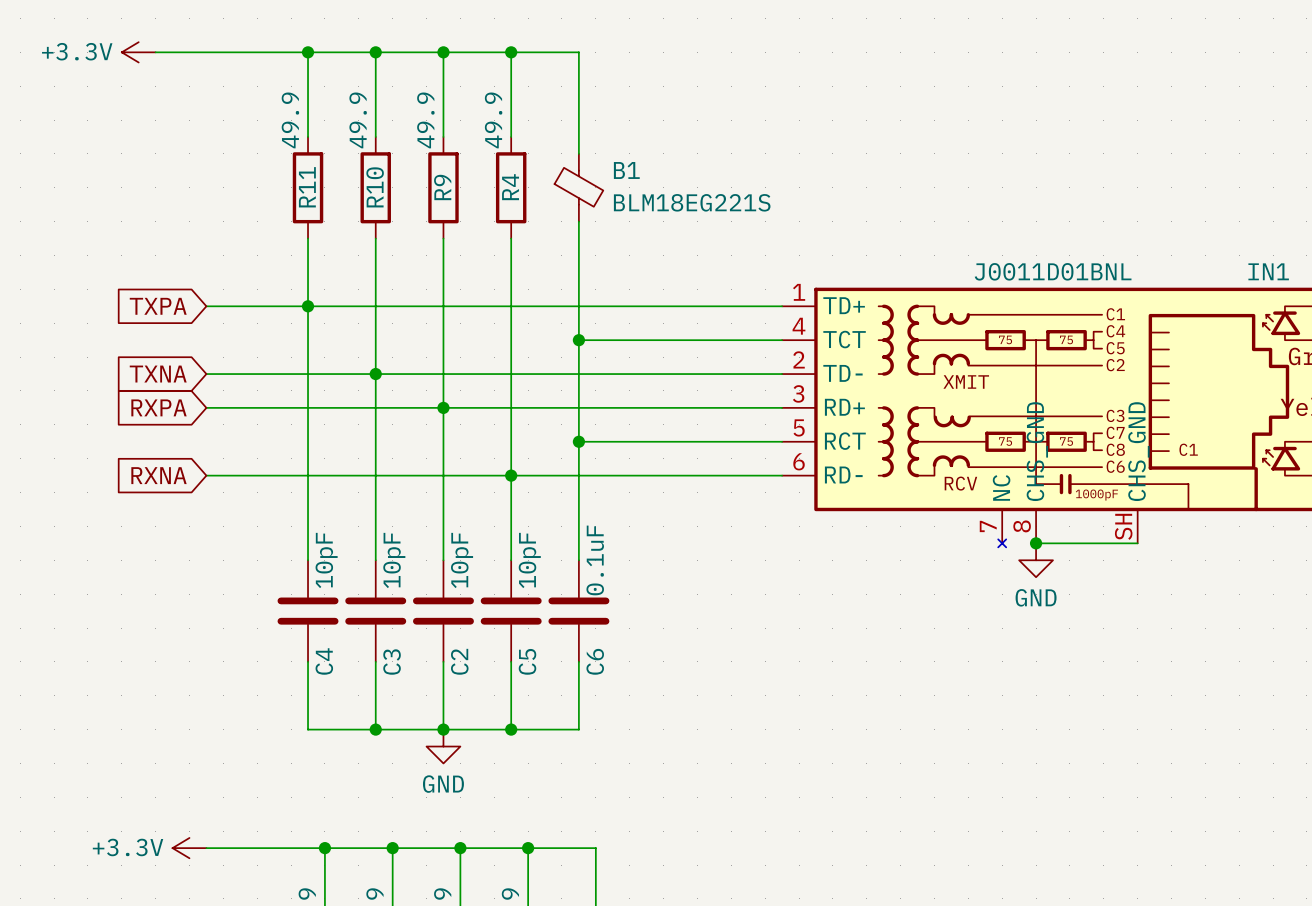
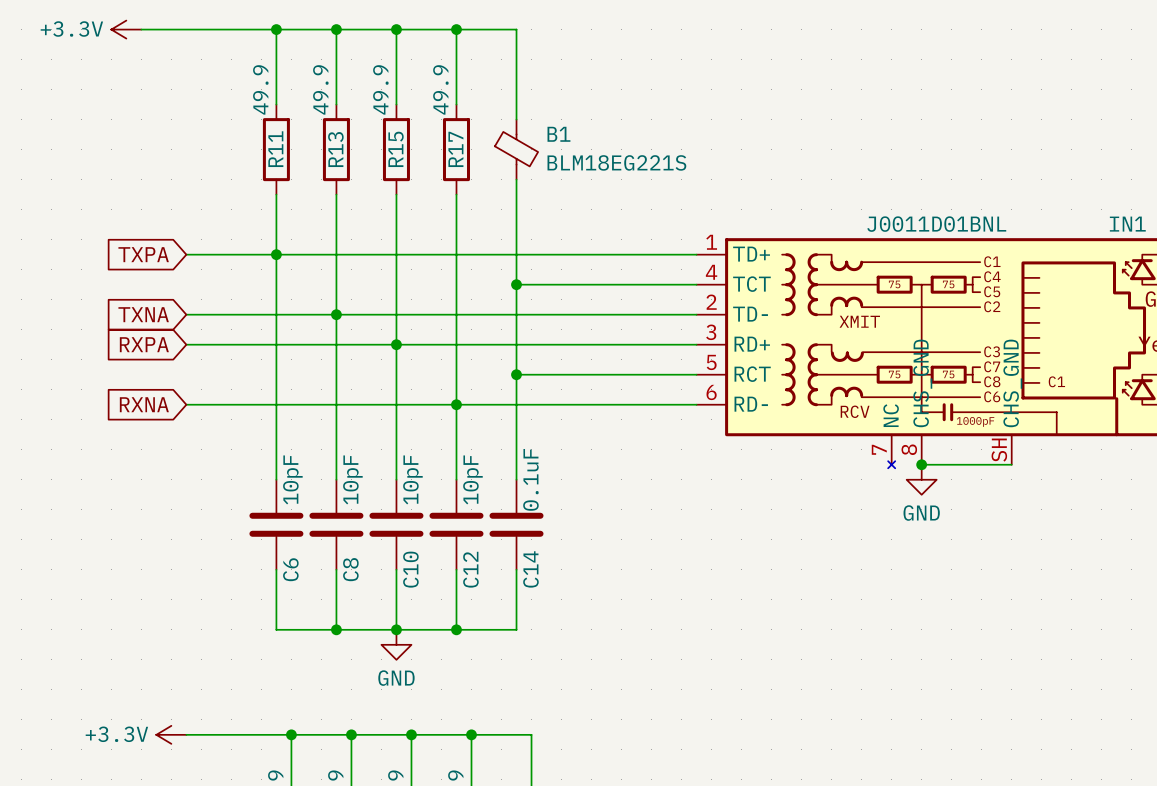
R10 name: R10 (375, 187) -> R13 (335, 149)
R9 name: R9 (442, 187) -> R15 (396, 149)
R4 name: R4 (510, 187) -> R17 (455, 149)
C4 name: C4 (324, 661) -> C6 (290, 569)
C2 name: C2 (459, 661) -> C10 (410, 569)
C5 name: C5 (527, 661) -> C12 (470, 569)
C6 name: C6 (595, 661) -> C14 (530, 569)
C3 name: C3 (392, 662) -> C8 (350, 569)

